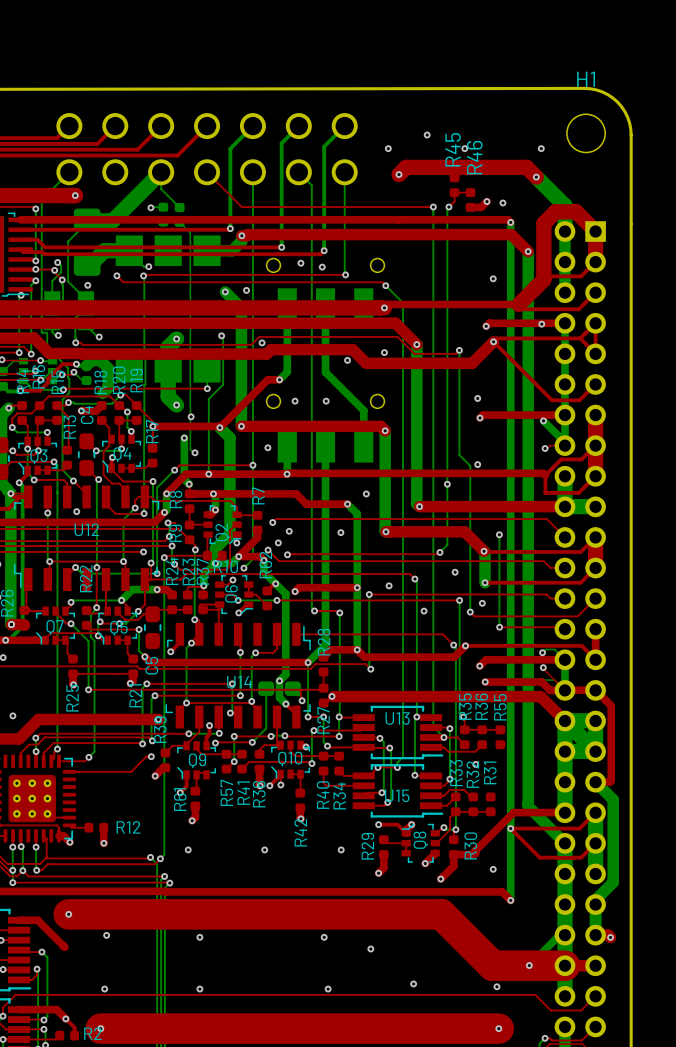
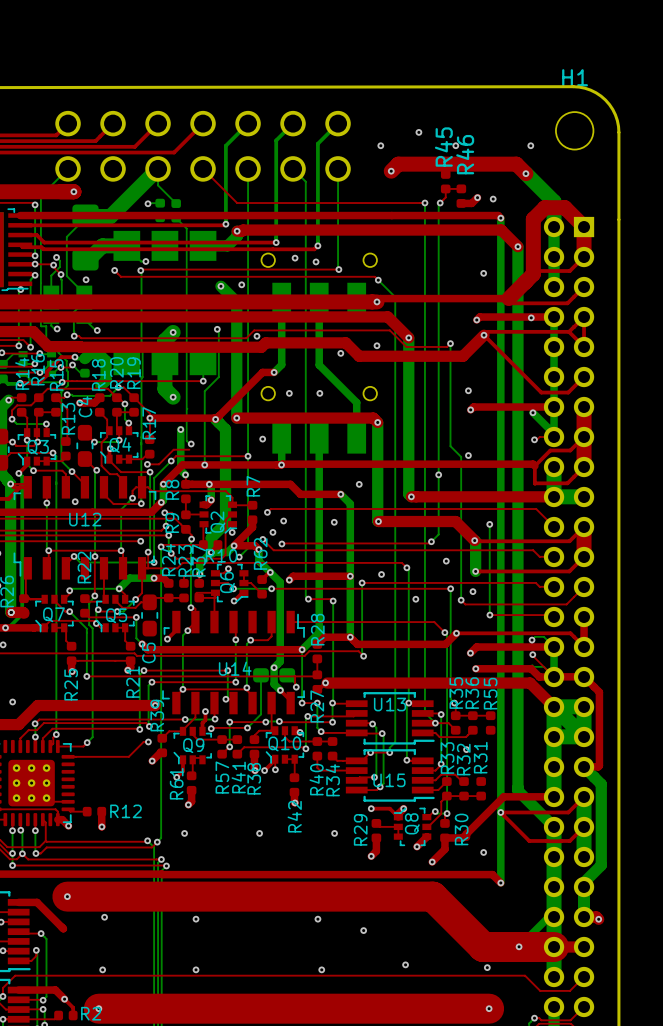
via position: (191, 416) -> (147, 464)
top track: none -> (189, 449) (173, 449) (159, 464) (147, 464)

